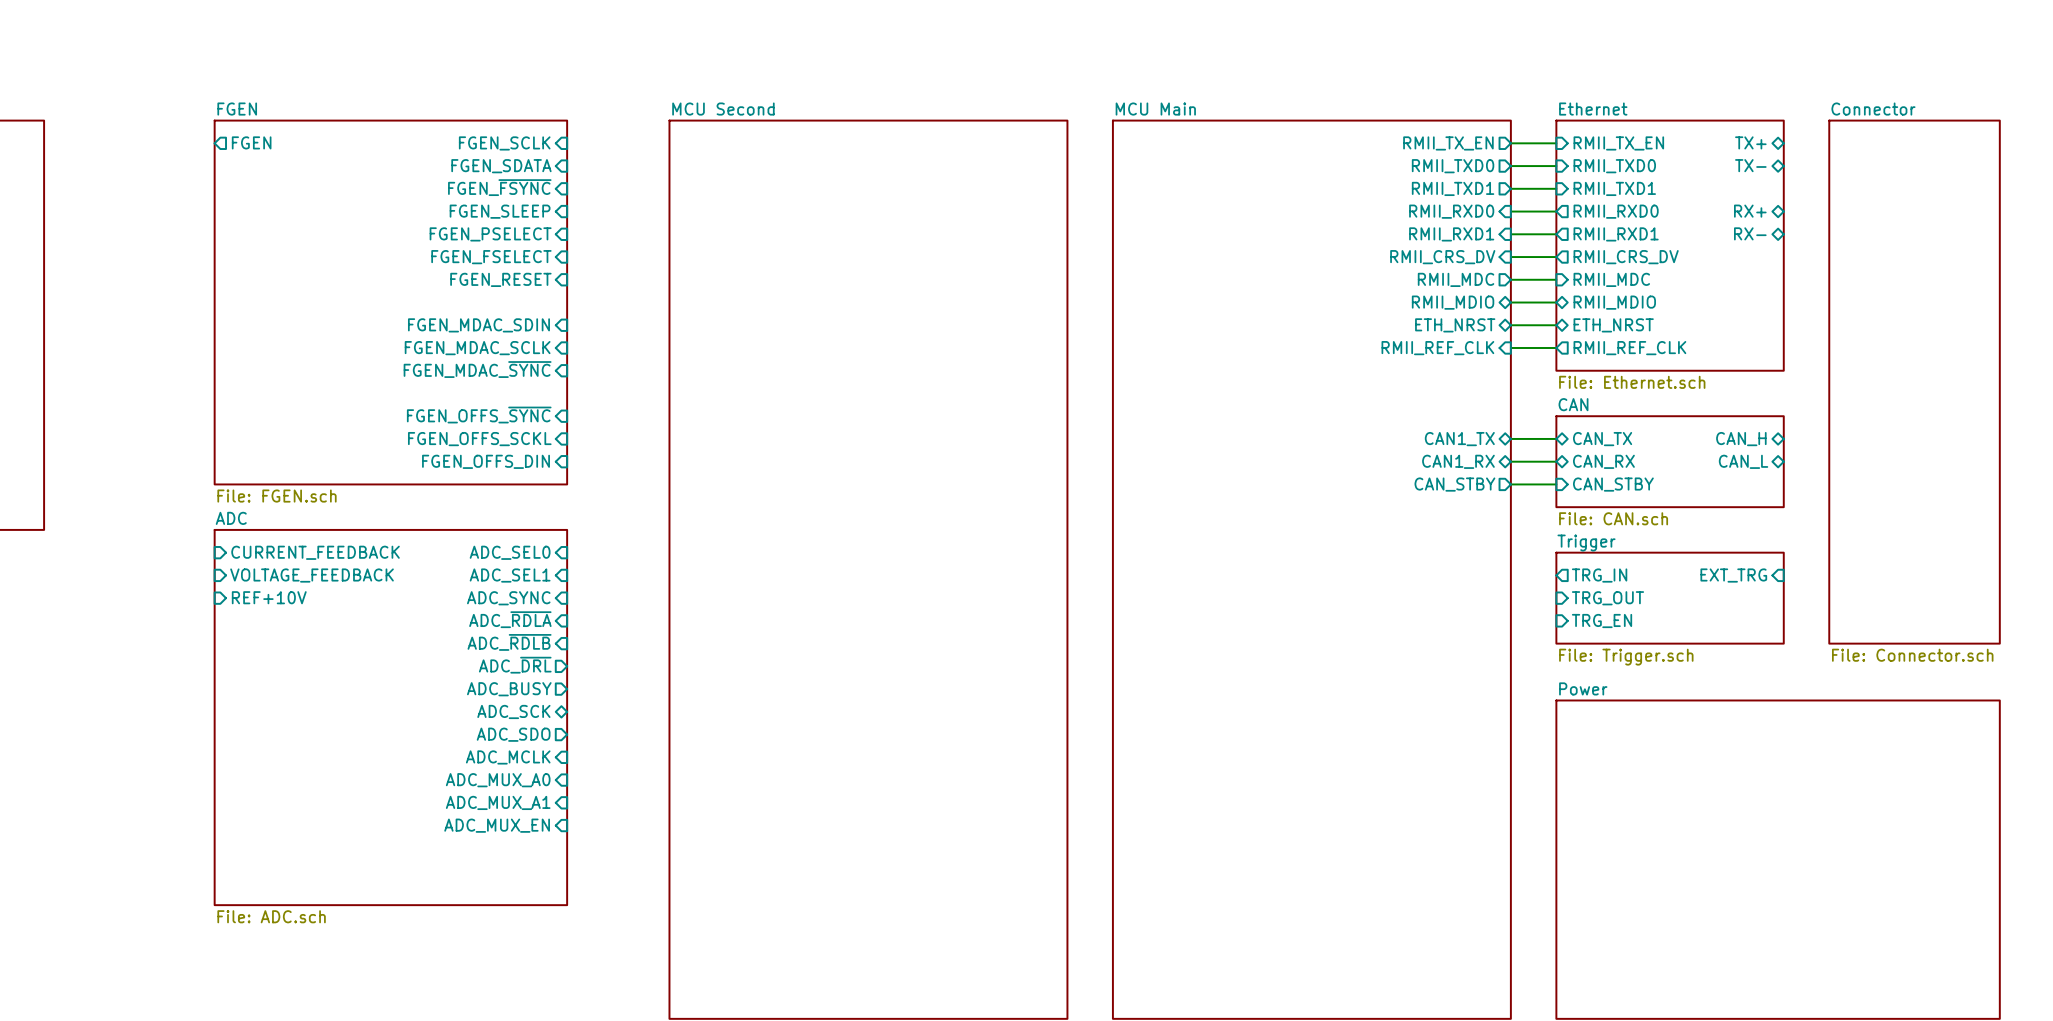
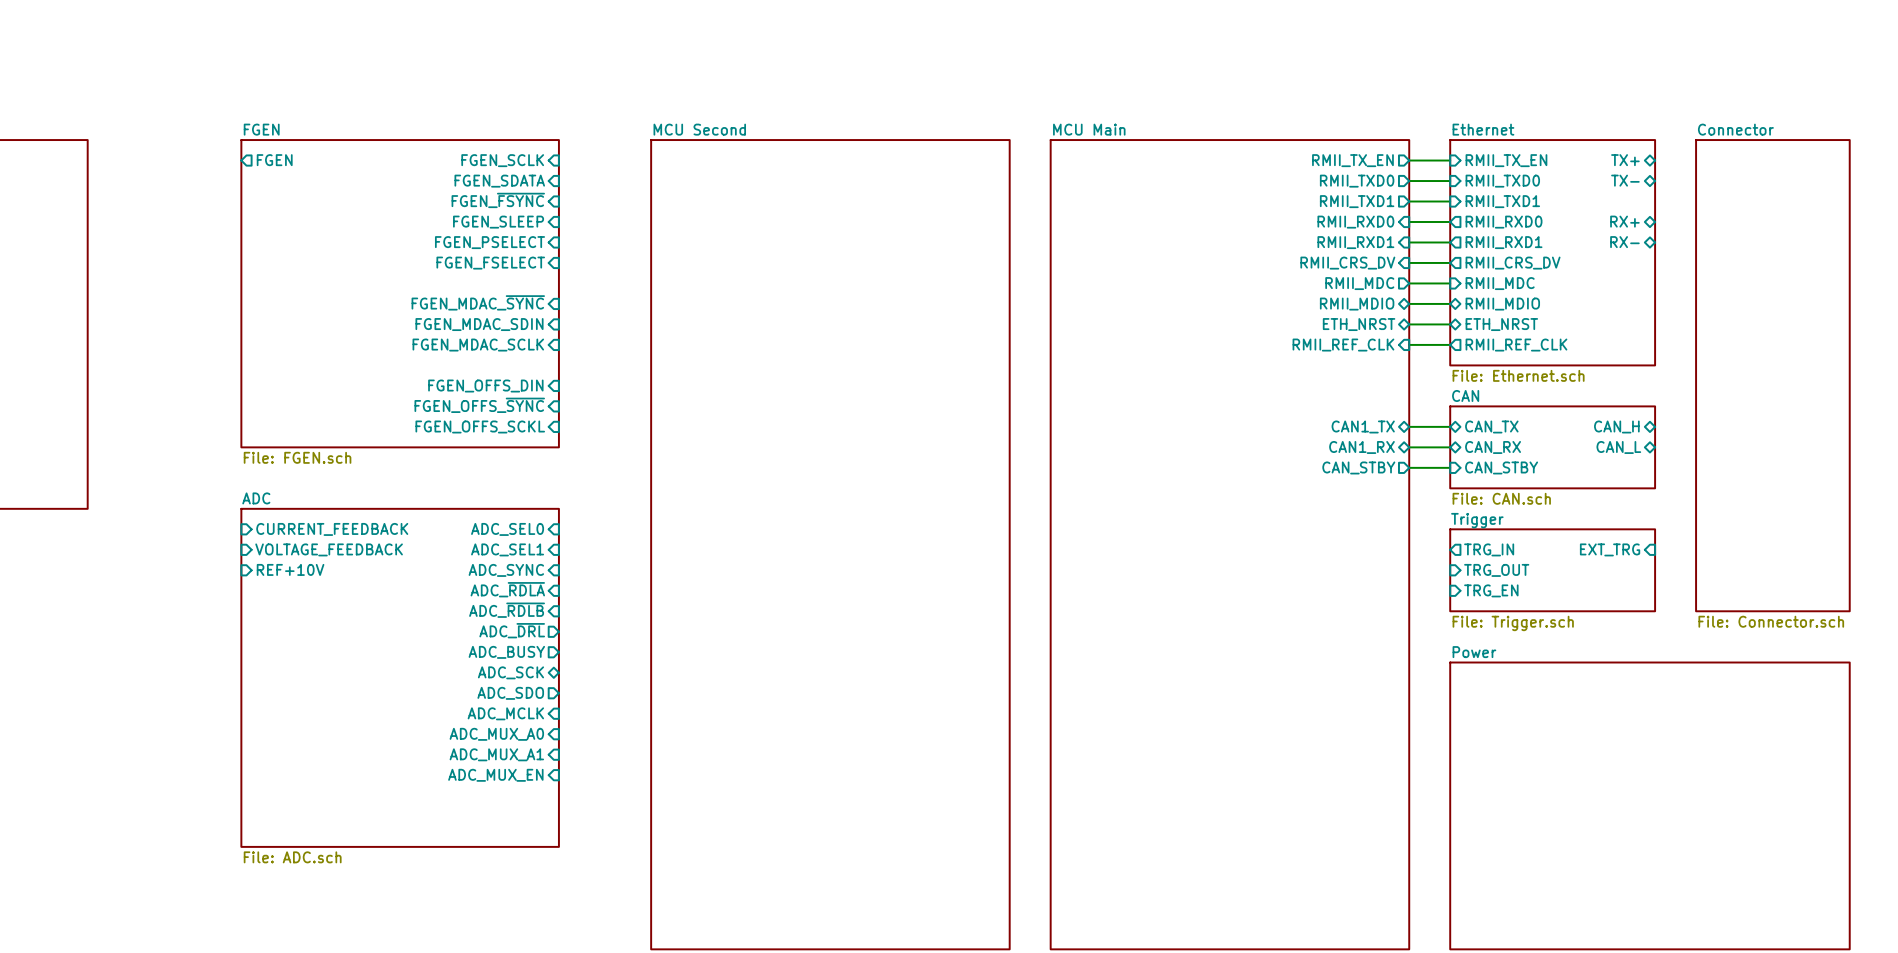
sheet pin: FGEN_RESET (500, 279) -> none
sheet FGEN: none -> File: FGEN.sch (400, 293)
sheet FGEN: File: FGEN.sch (390, 302) -> none
sheet pin position: FGEN_MDAC_~{SYNC} (477, 369) -> FGEN_MDAC_~{SYNC} (478, 302)
sheet pin position: FGEN_OFFS_DIN (486, 461) -> FGEN_OFFS_DIN (485, 386)

